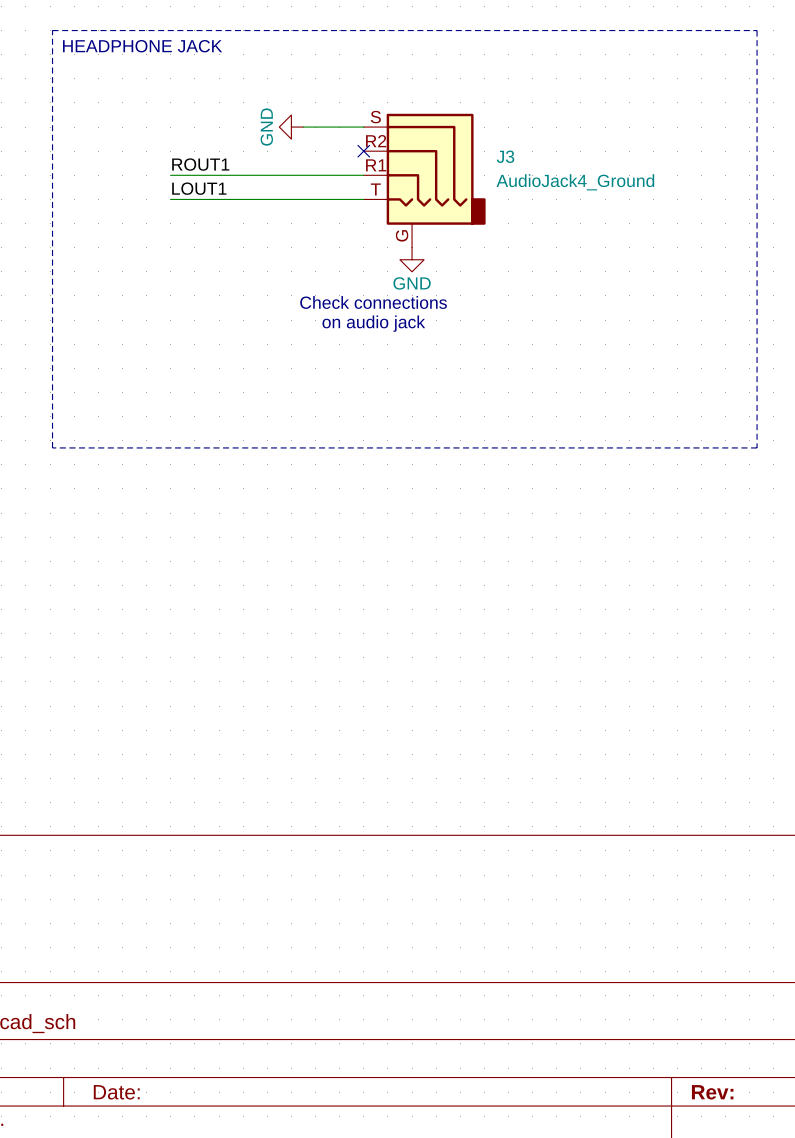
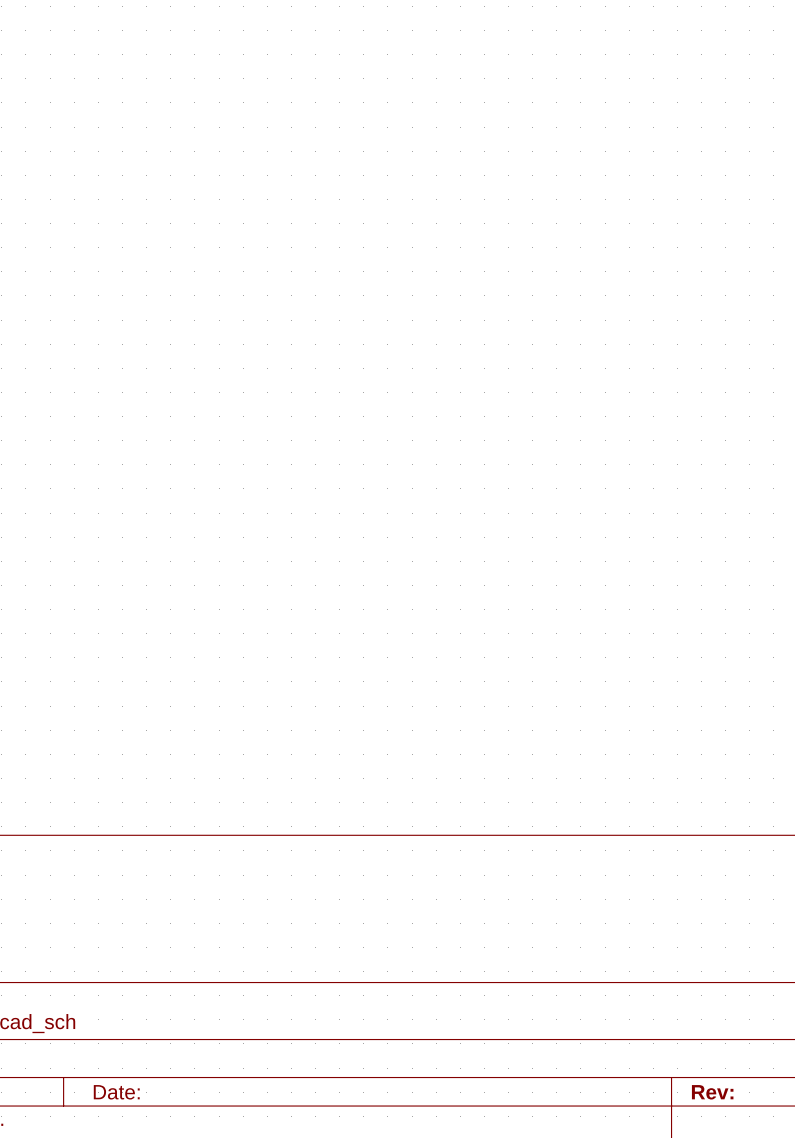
line: (52, 30) (757, 30) (757, 447) (52, 447) (52, 30) -> none
text: HEADPHONE JACK (142, 46) -> none
power symbol: GND (291, 127) -> none
wire: (303, 127) (363, 127) -> none
no-connect mark: (363, 151) -> none
label: ROUT1 (200, 164) -> none
wire: (170, 175) (363, 175) -> none
J3: AudioJack4_Ground (424, 180) -> none
label: LOUT1 (199, 188) -> none
wire: (170, 199) (363, 199) -> none
power symbol: GND (412, 259) -> none
text: Check connections (373, 302) -> none
text: on audio jack (373, 323) -> none

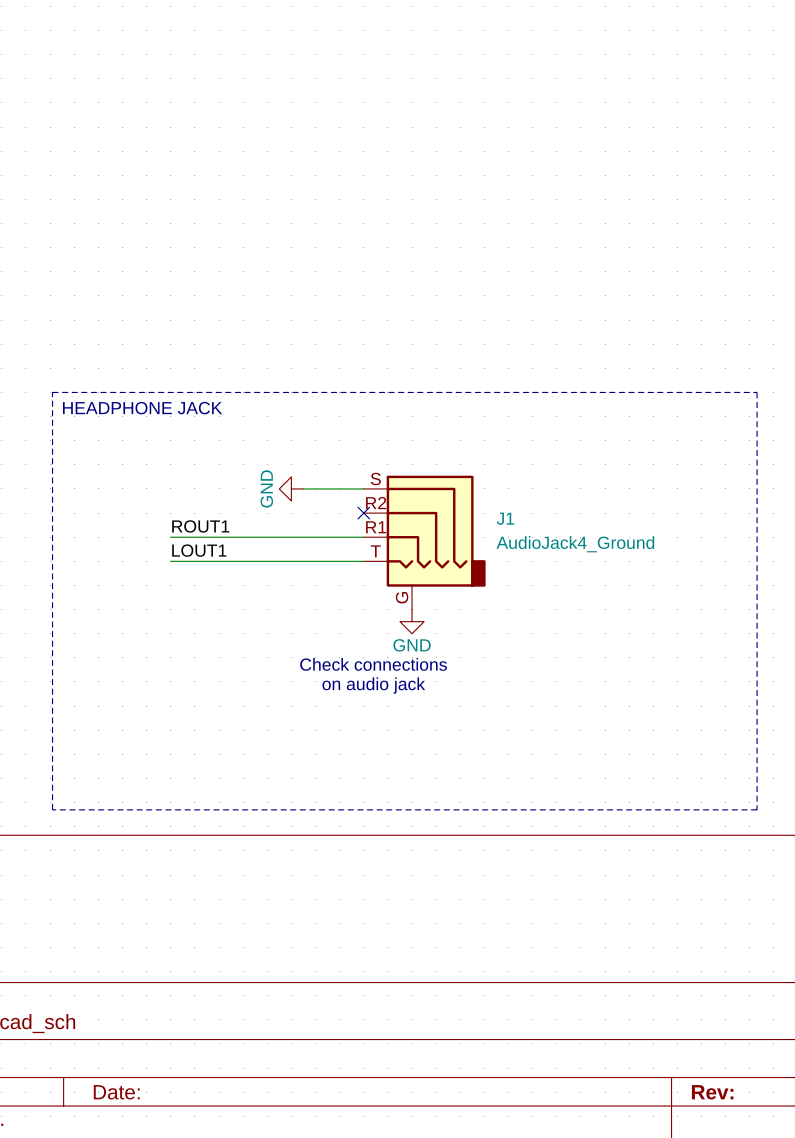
line: none -> (52, 392) (757, 392) (757, 809) (52, 809) (52, 392)
text: none -> HEADPHONE JACK (142, 408)
power symbol: none -> GND (291, 488)
wire: none -> (303, 488) (363, 488)
no-connect mark: none -> (363, 513)
label: none -> ROUT1 (200, 526)
wire: none -> (170, 537) (363, 537)
J1: none -> AudioJack4_Ground (424, 542)
label: none -> LOUT1 (199, 550)
wire: none -> (170, 561) (363, 561)
power symbol: none -> GND (412, 621)
text: none -> Check connections (373, 664)
text: none -> on audio jack (373, 685)

